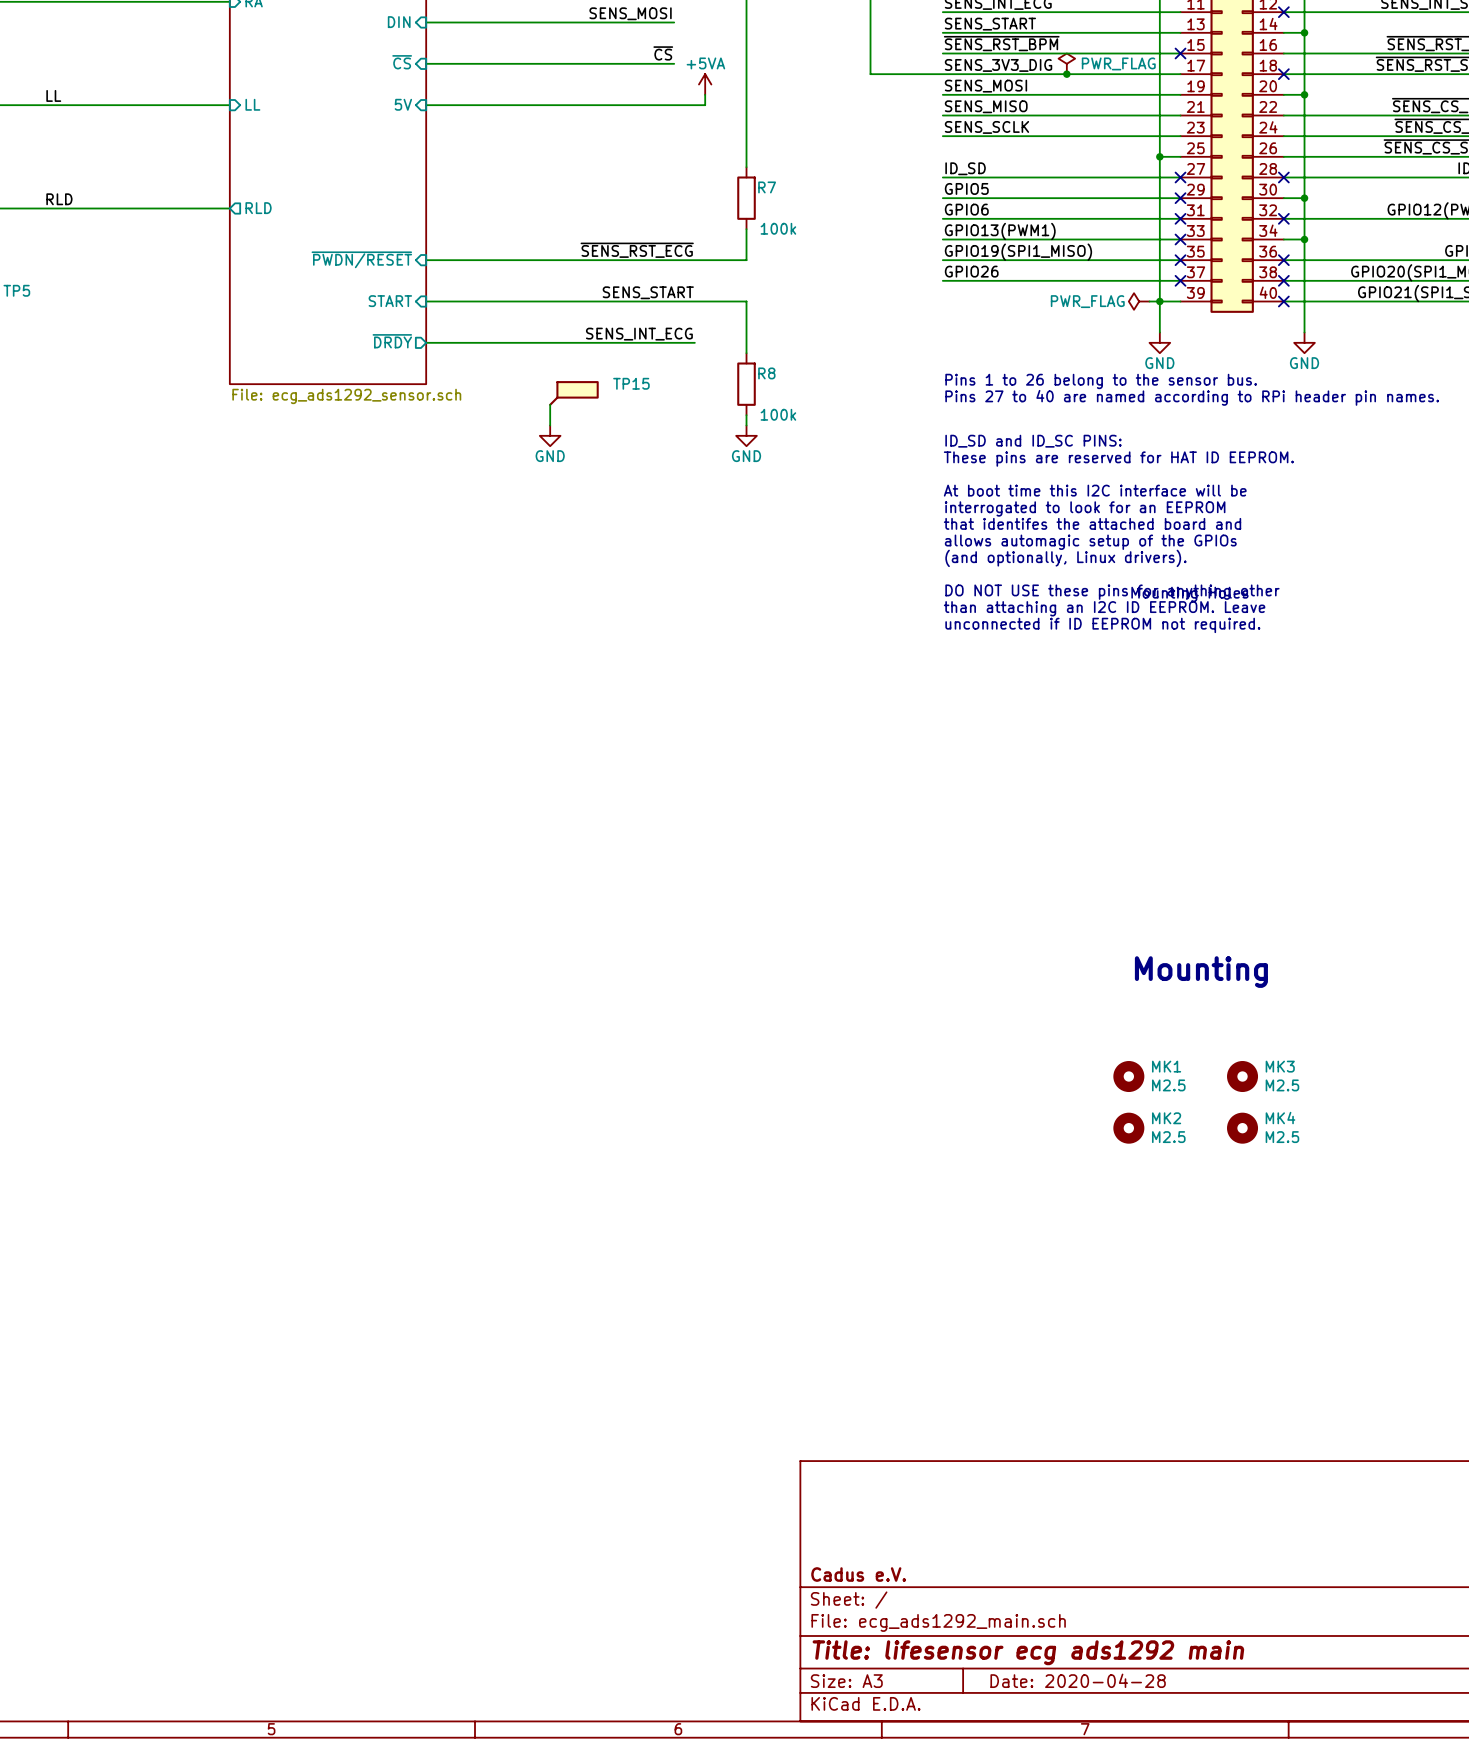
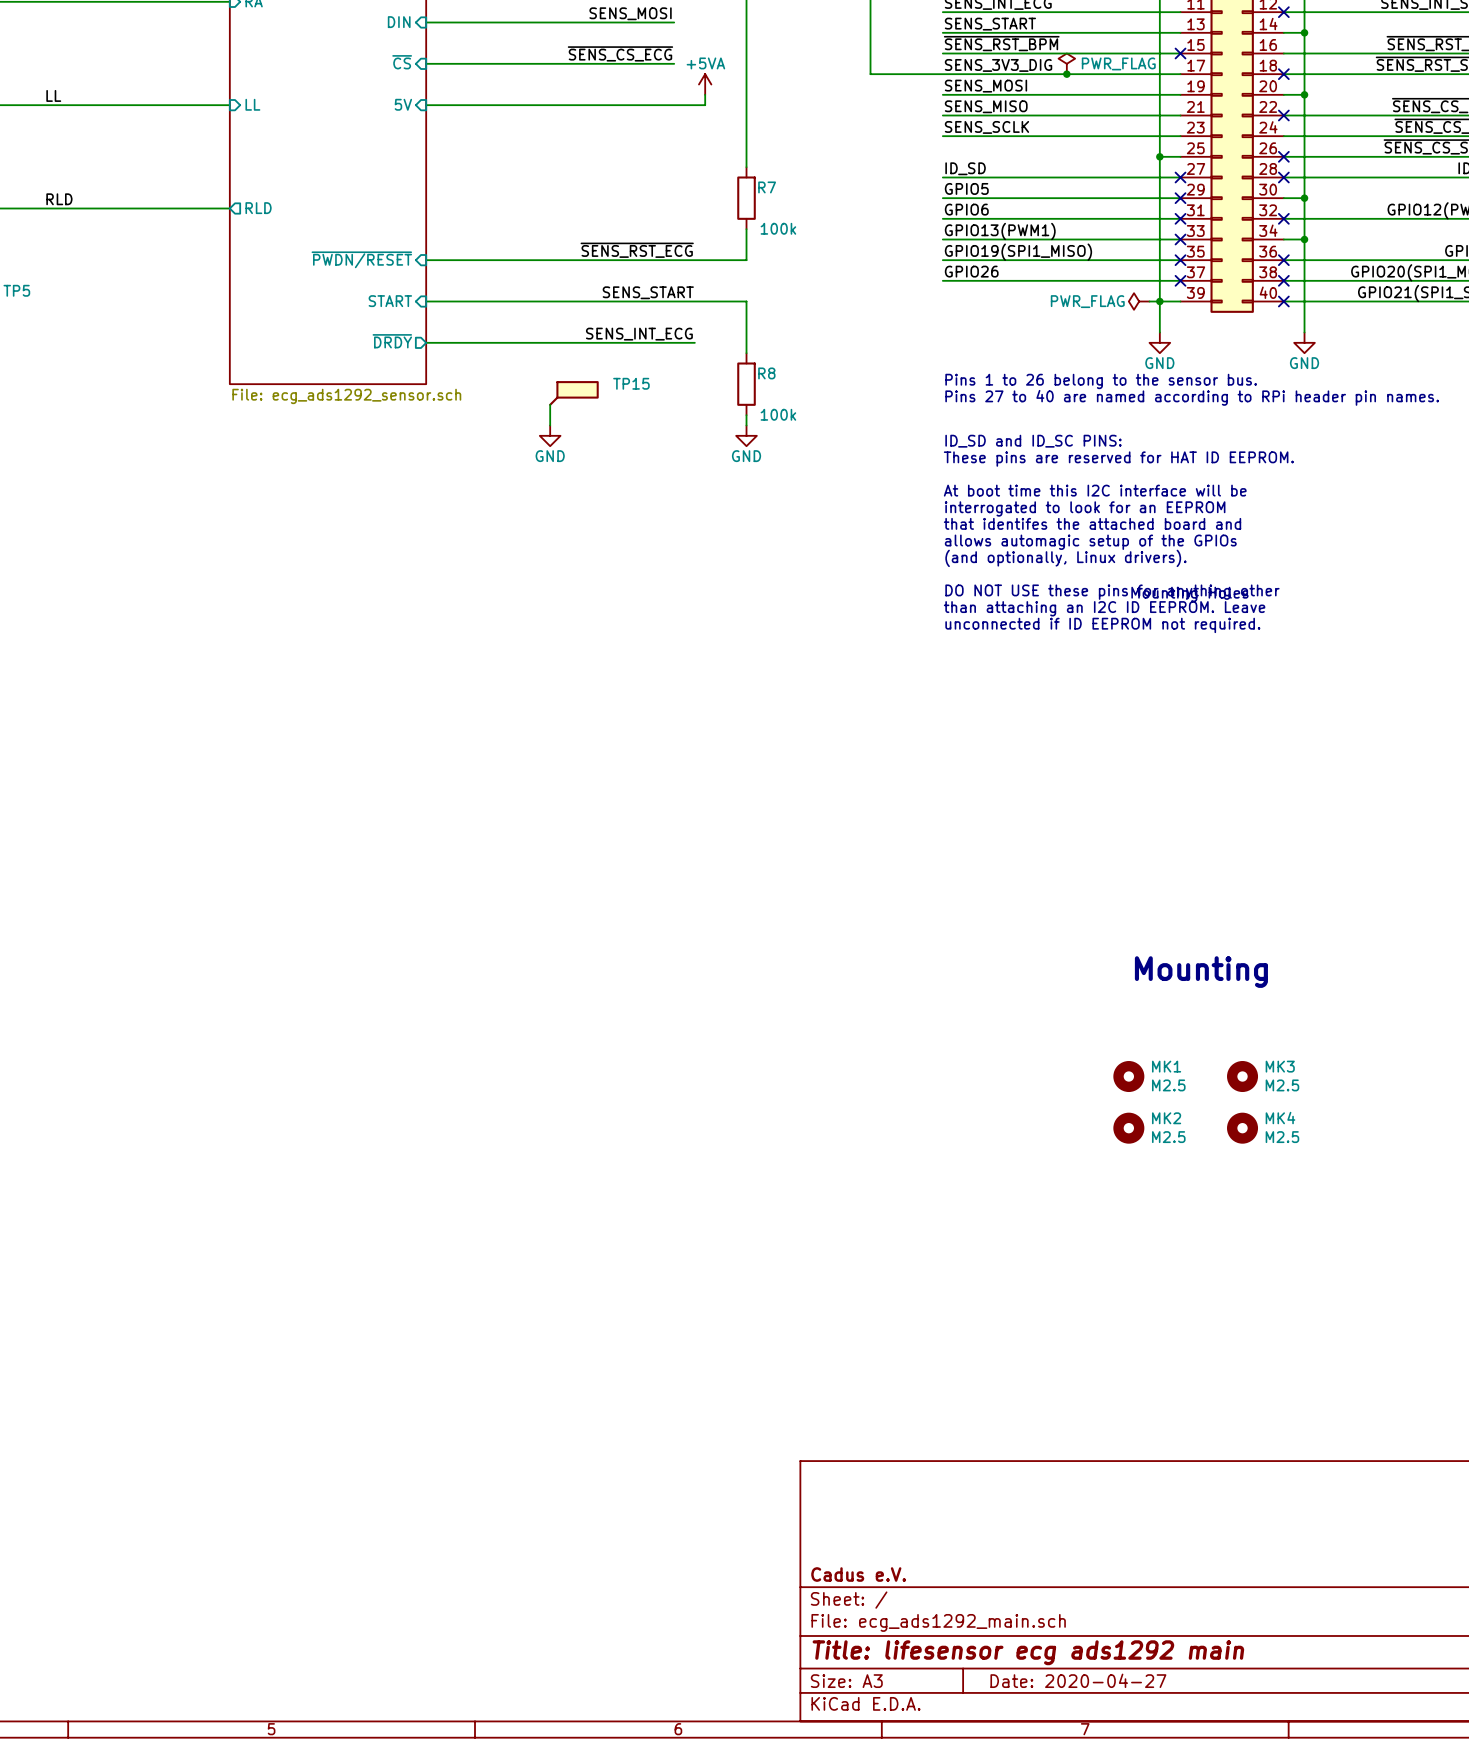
label: ~{CS} (663, 53) -> ~{SENS_CS_ECG} (620, 53)
no-connect mark: none -> (1283, 115)
no-connect mark: none -> (1283, 156)
title block: Date: 2020-04-28 (1078, 1680) -> Date: 2020-04-27 (1078, 1680)

